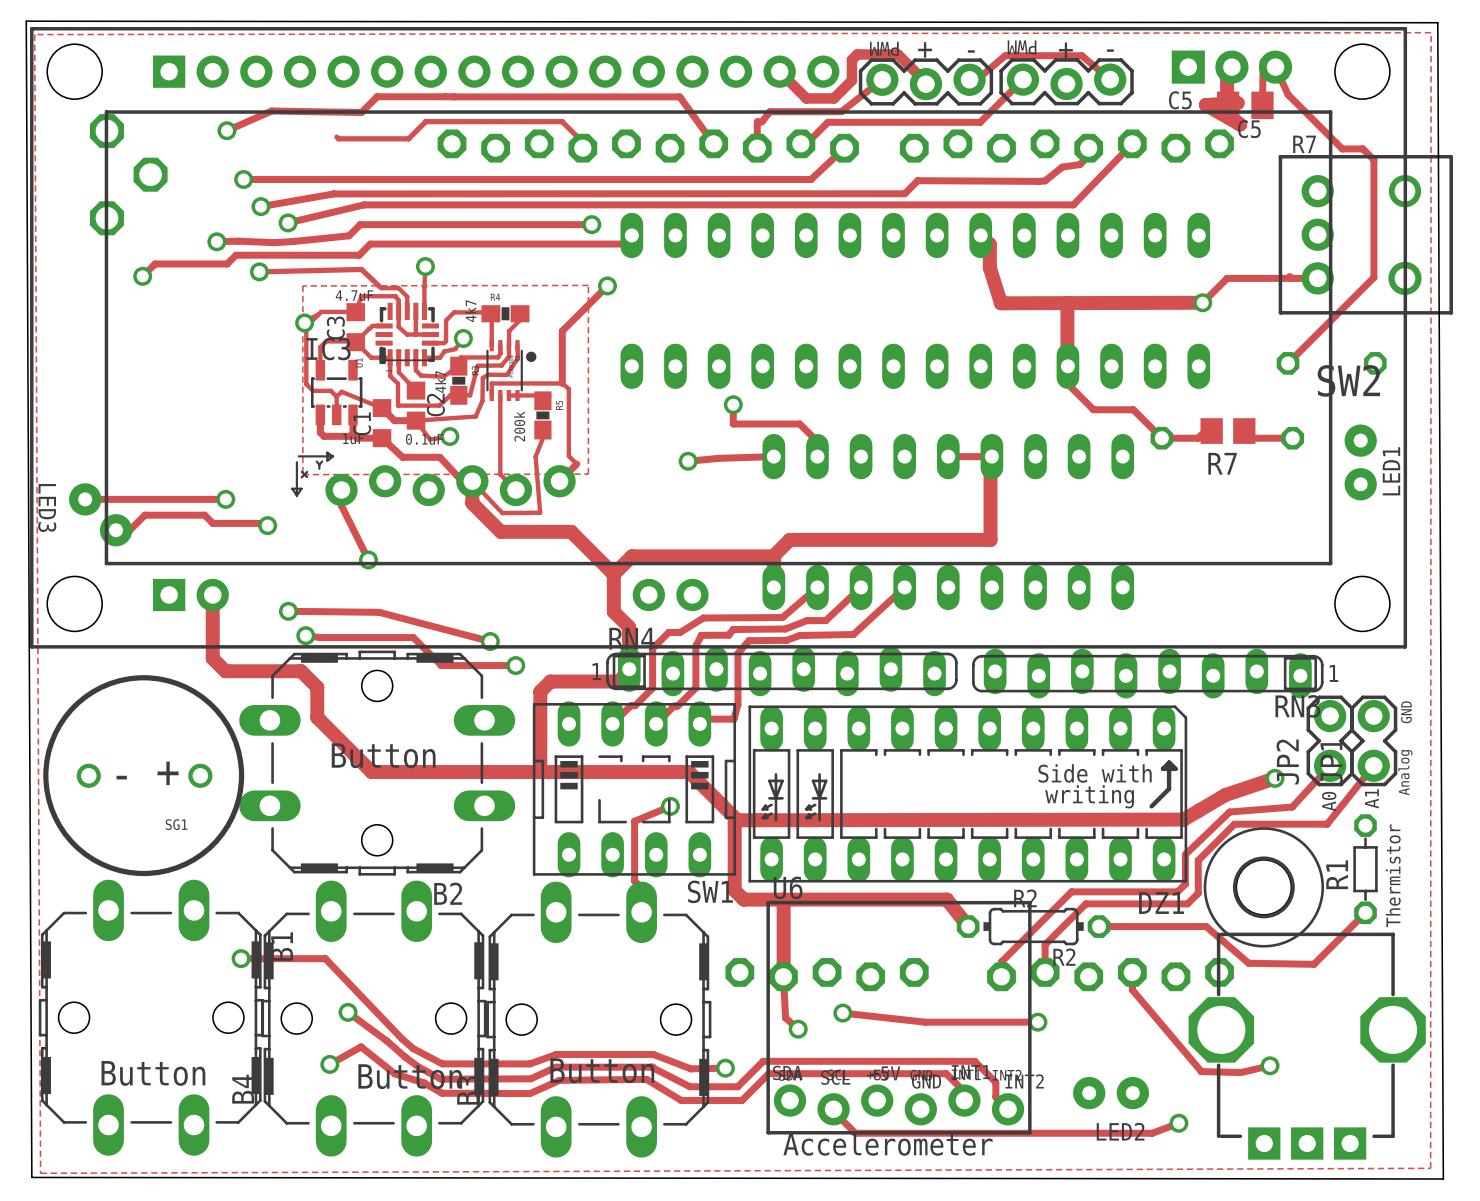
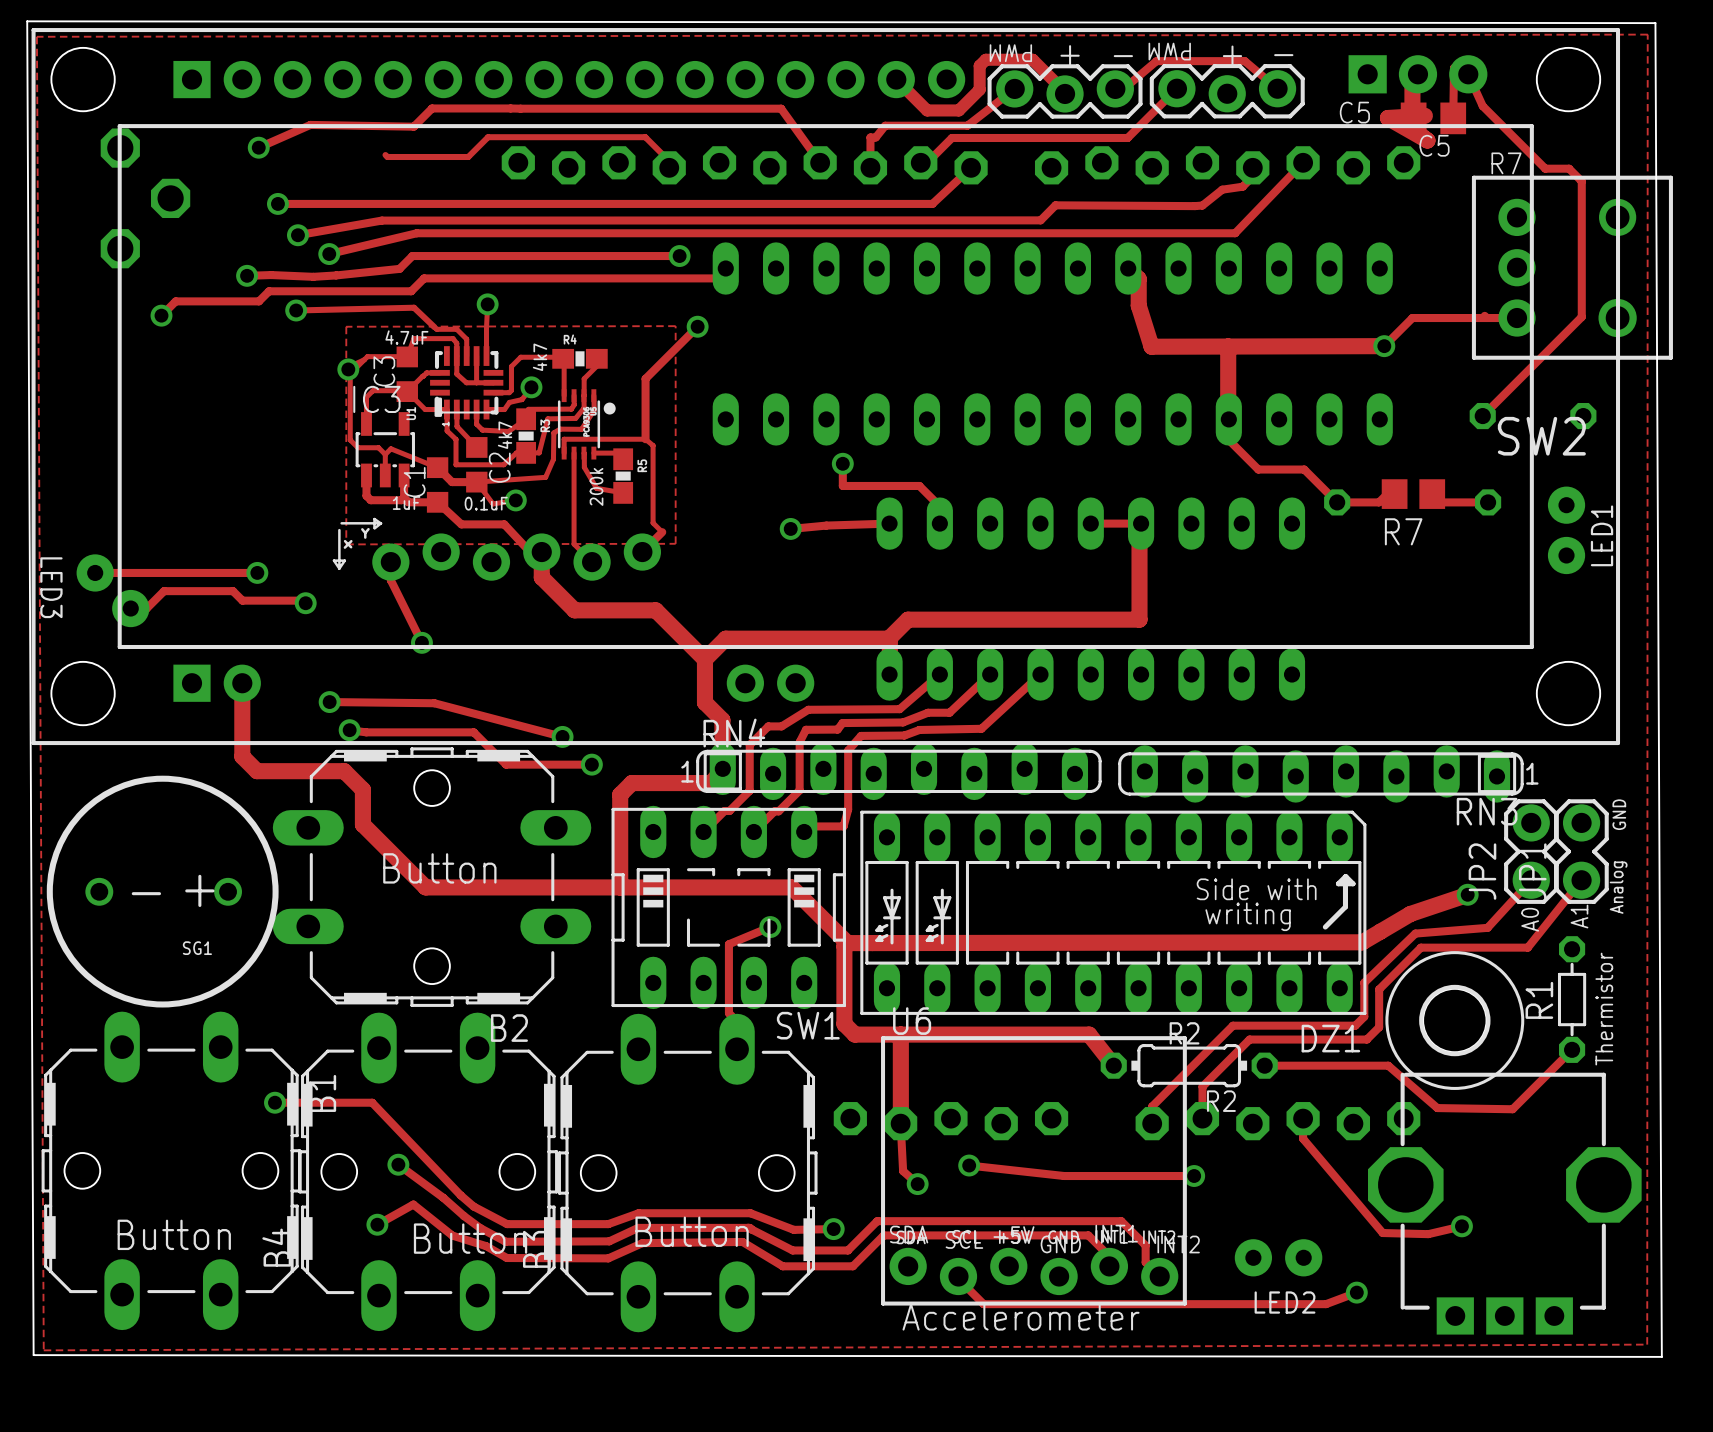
track: (508, 395) (517, 395) -> (583, 453) (584, 467) (596, 488) (623, 492)
track: (542, 430) (543, 435) (535, 456) (540, 512) (502, 513) (472, 481) -> none

